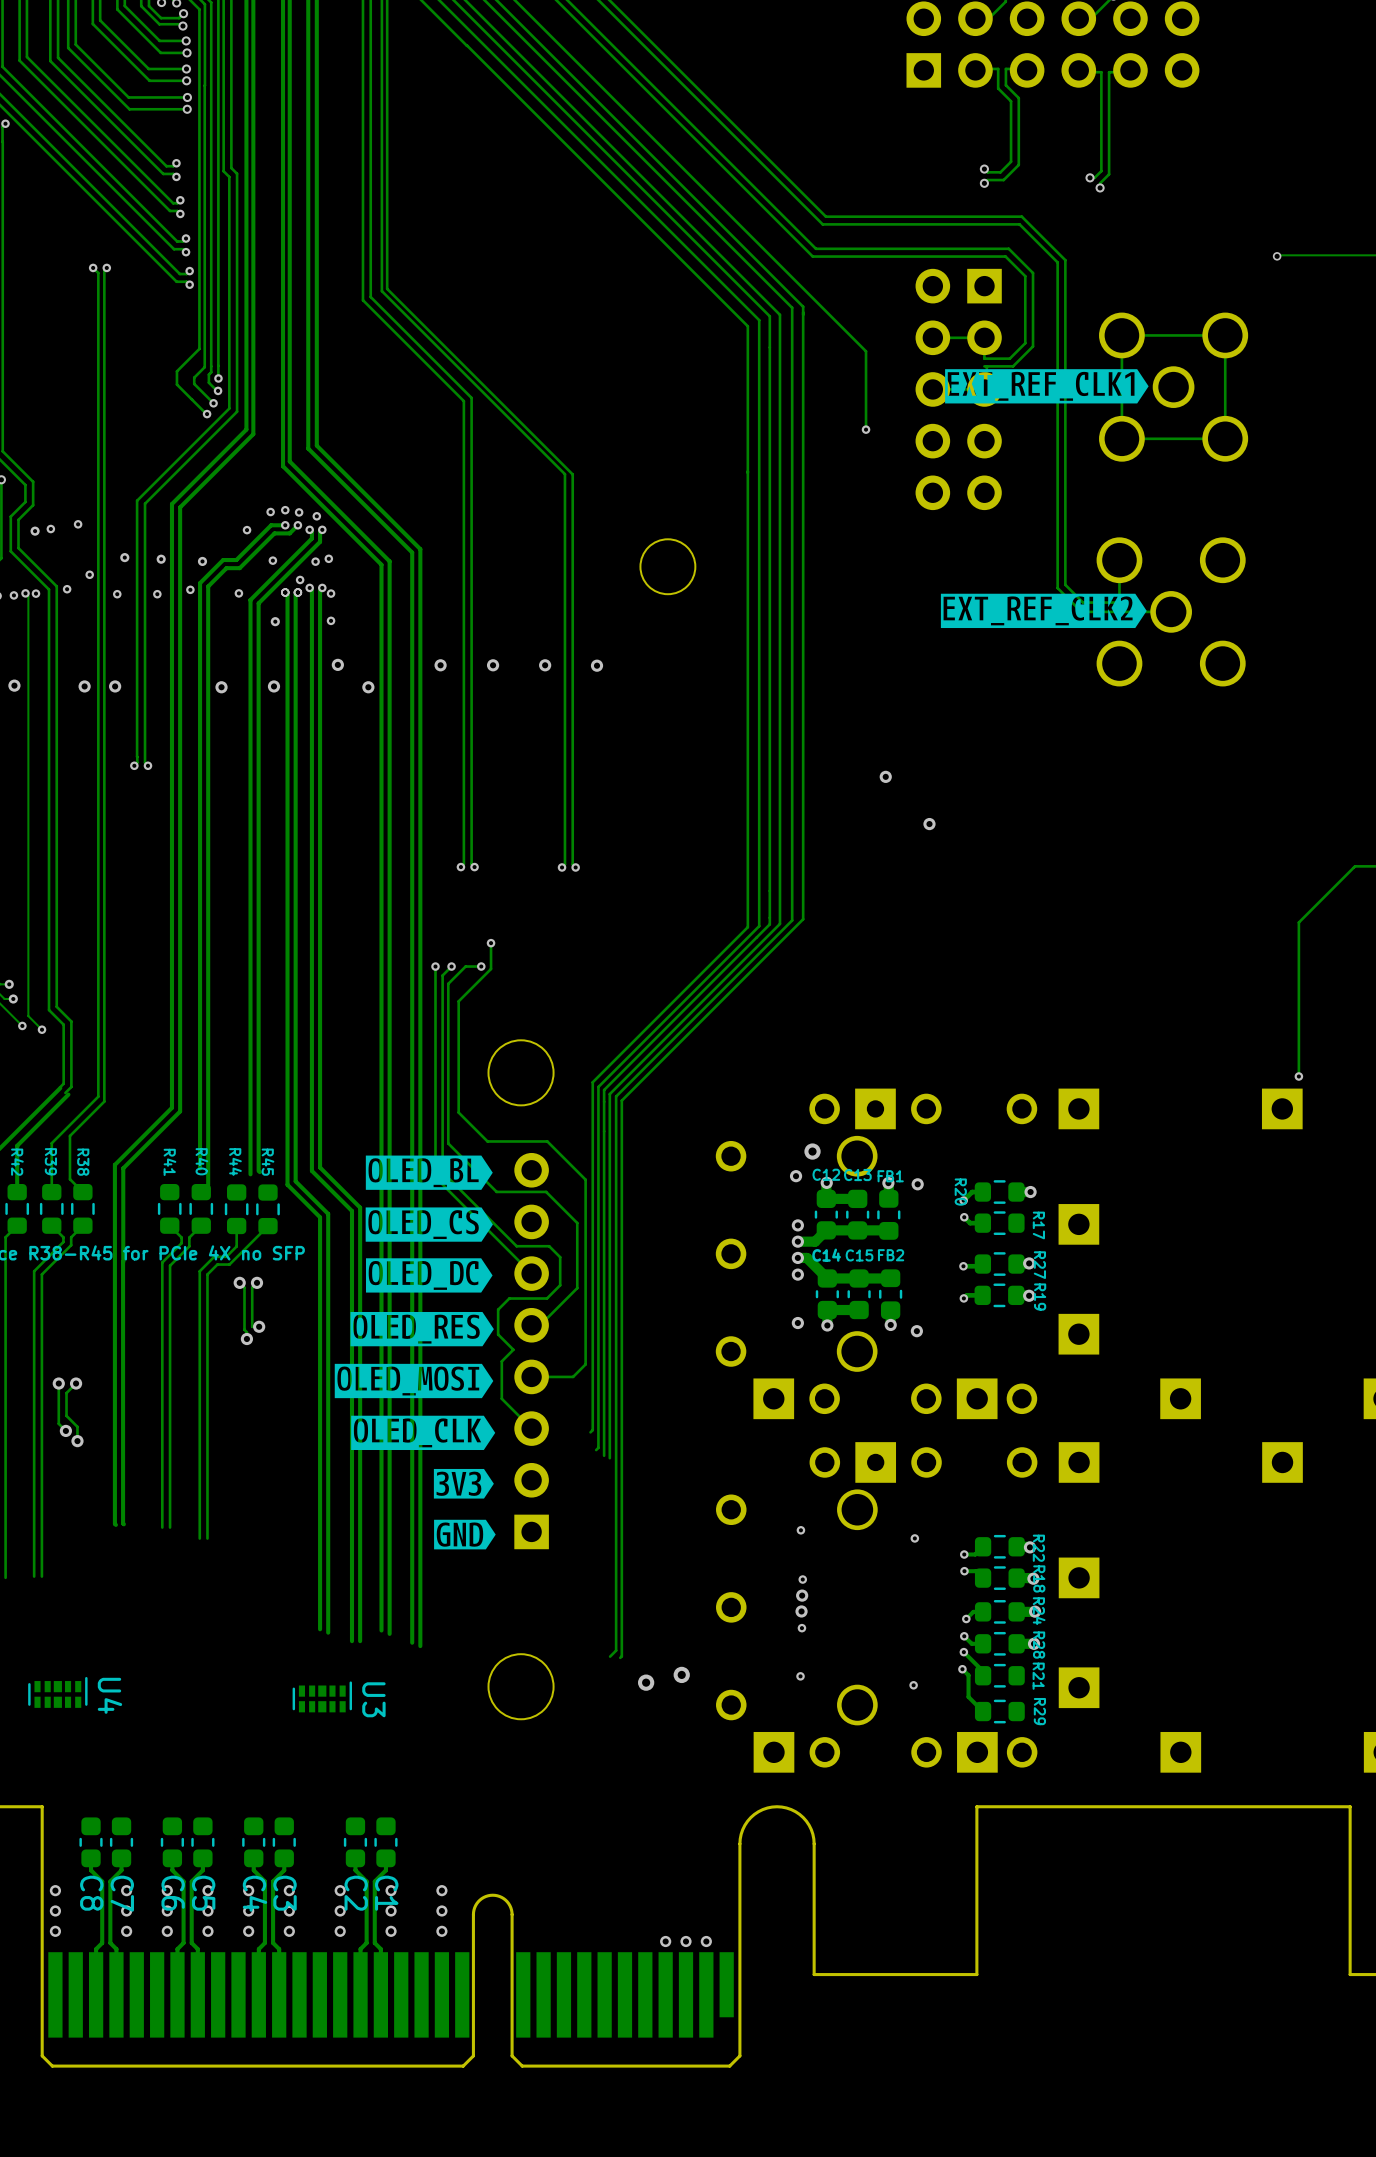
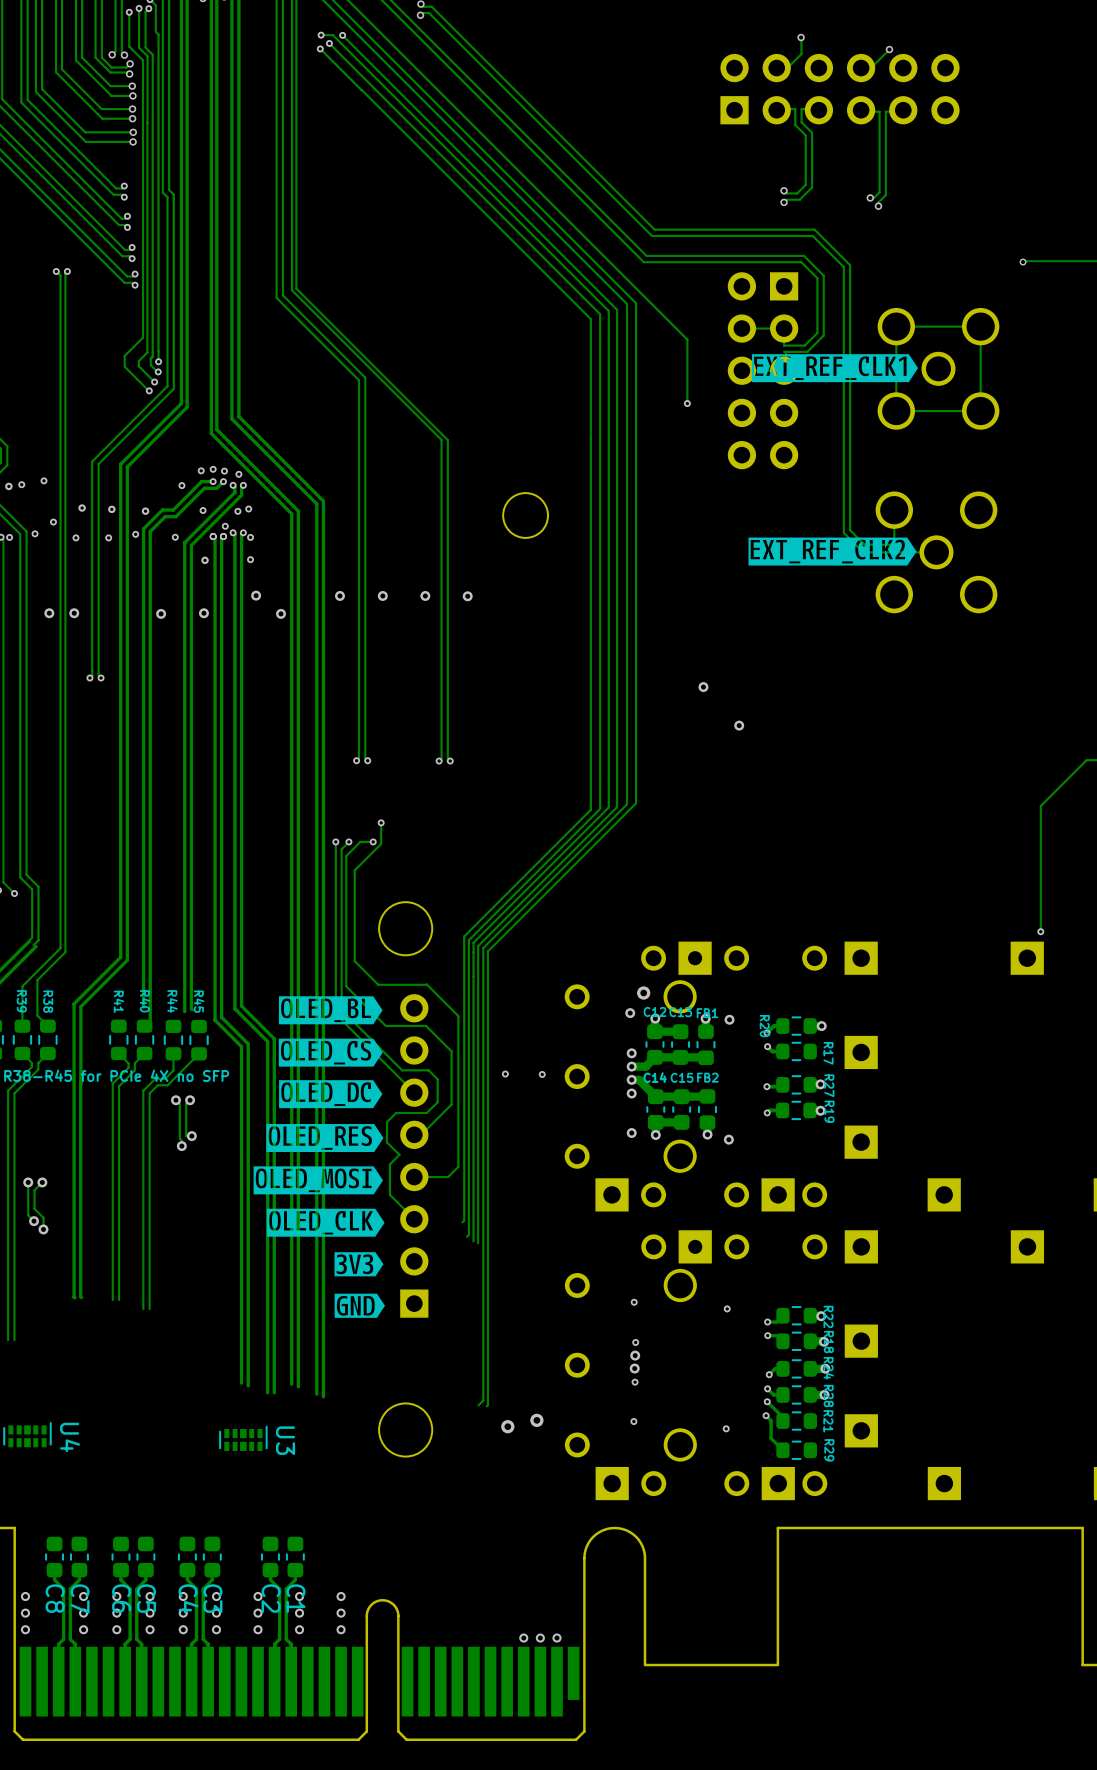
via: none -> (505, 1074)
via: none -> (542, 1074)

